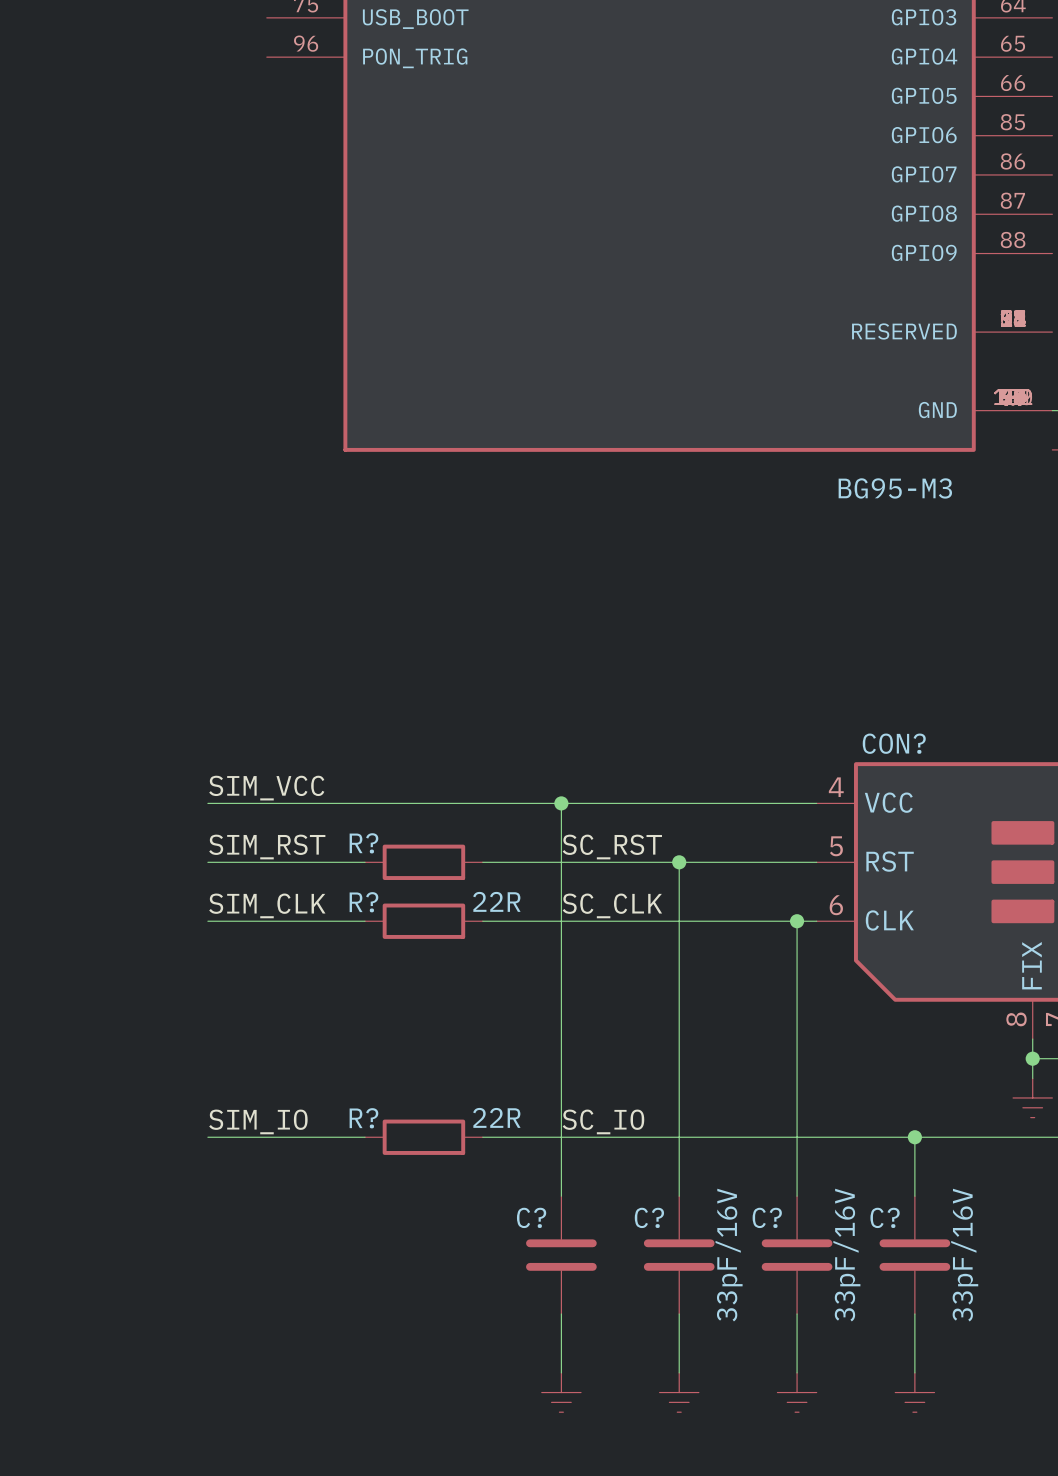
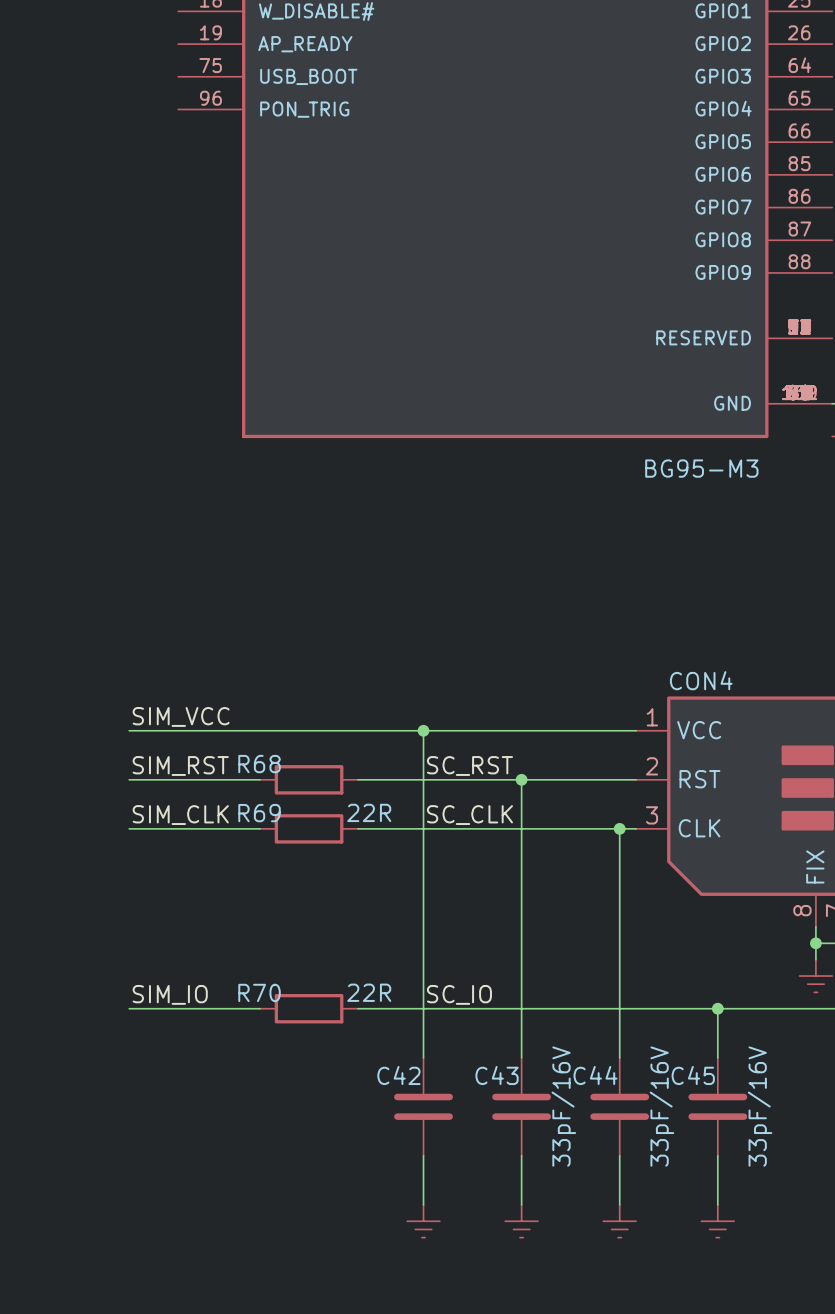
CON? name: CON? (894, 743) -> CON4 (701, 680)
CON? pin number: 4 (836, 787) -> 1 (652, 717)
R? name: R? (363, 843) -> R68 (259, 764)
CON? pin number: 5 (836, 846) -> 2 (652, 766)
R? name: R? (363, 902) -> R69 (259, 813)
CON? pin number: 6 (836, 905) -> 3 (652, 815)
R? name: R? (363, 1118) -> R70 (259, 992)
C? name: C? (531, 1217) -> C42 (398, 1075)
C? name: C? (649, 1217) -> C43 (497, 1075)
C? name: C? (767, 1217) -> C44 (595, 1075)
C? name: C? (885, 1217) -> C45 (693, 1075)

